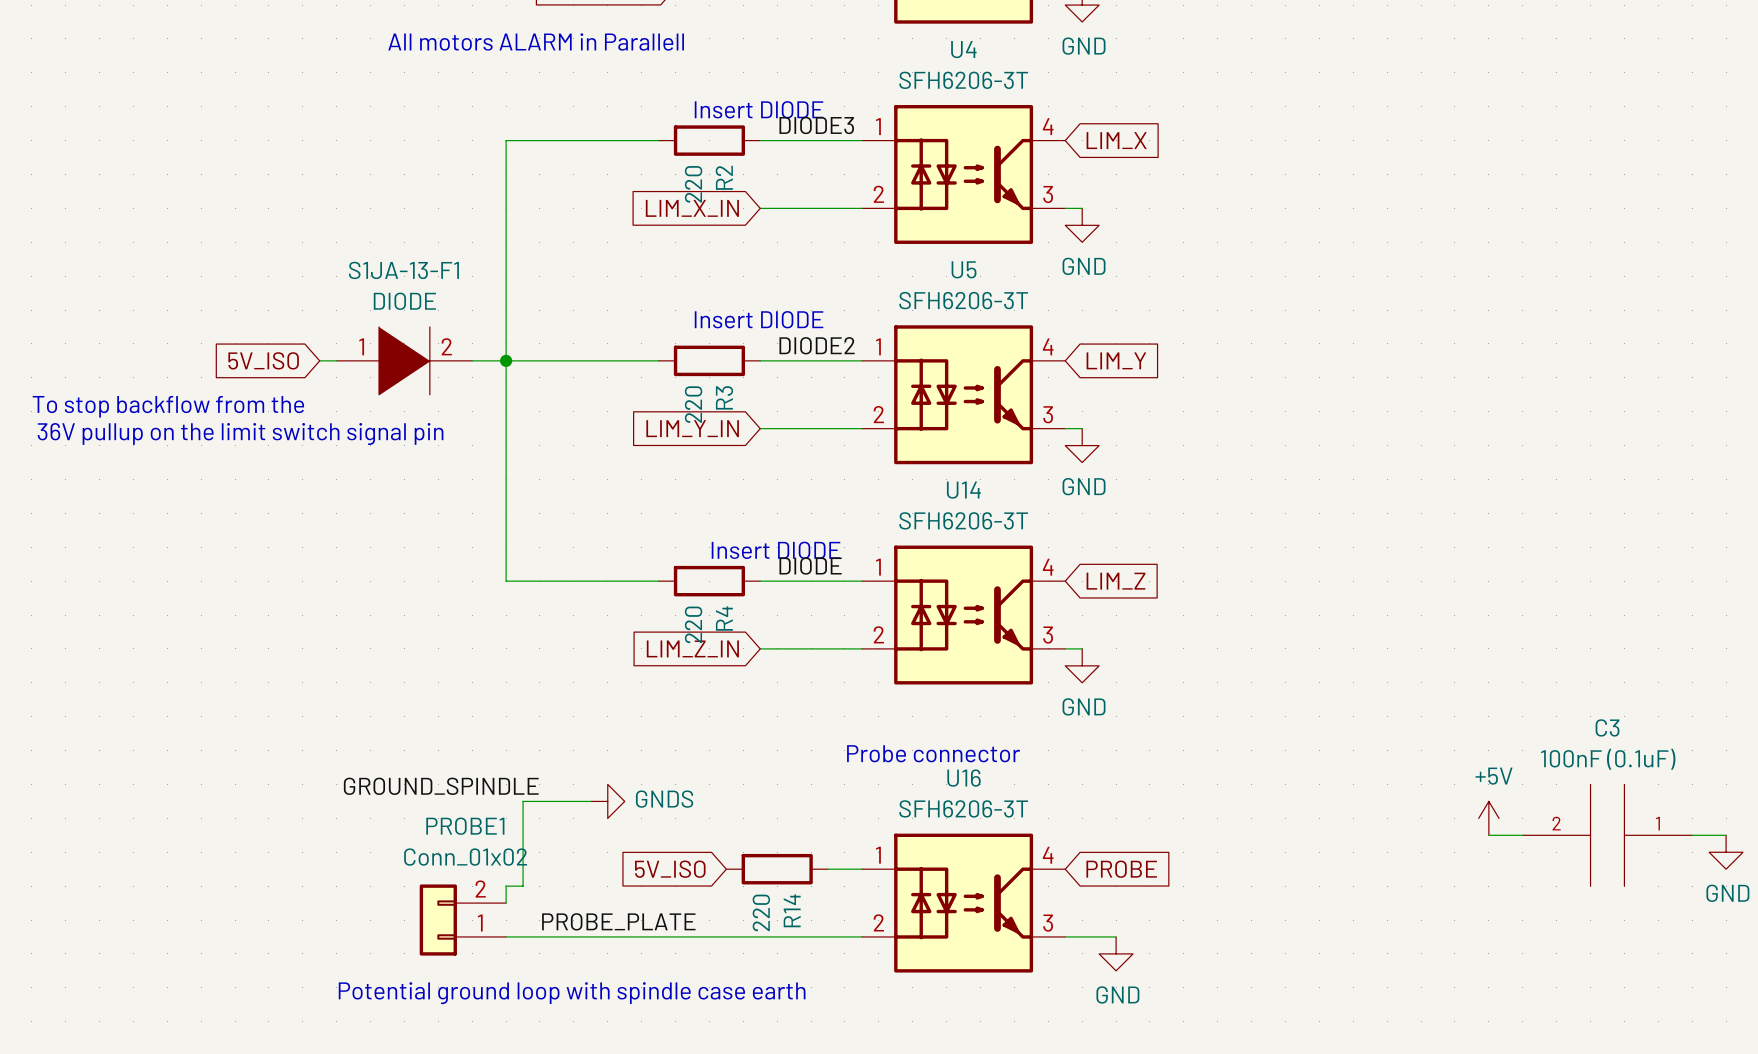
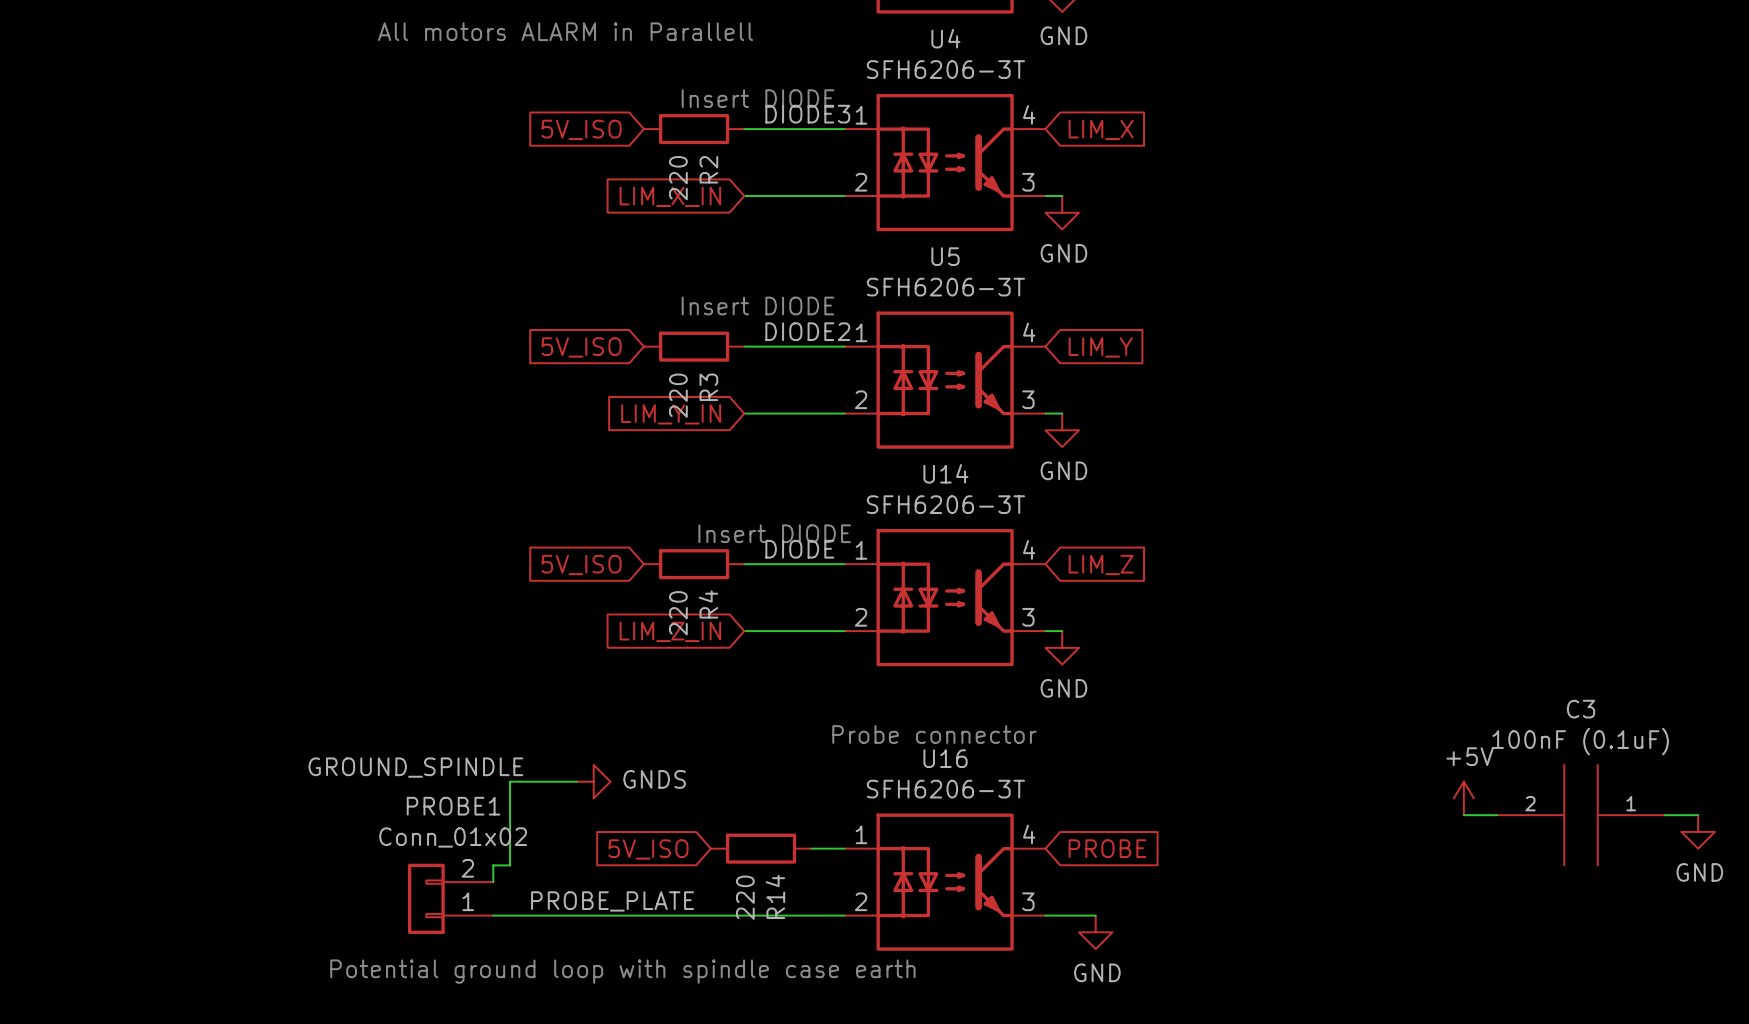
global label: none -> 5V_ISO (581, 129)
wire: (658, 140) (506, 140) (506, 581) (658, 581) -> none
global label: 5V_ISO (263, 360) -> none
wire: (319, 360) (336, 360) -> none
S1JA-13-F1: DIODE (404, 360) -> none
wire: (472, 360) (658, 360) -> none
junction: (506, 360) -> none
global label: none -> 5V_ISO (581, 347)
text: To stop backflow from the (168, 406) -> none
text: 36V pullup on the limit switch signal pin (240, 434) -> none
global label: none -> 5V_ISO (581, 564)

